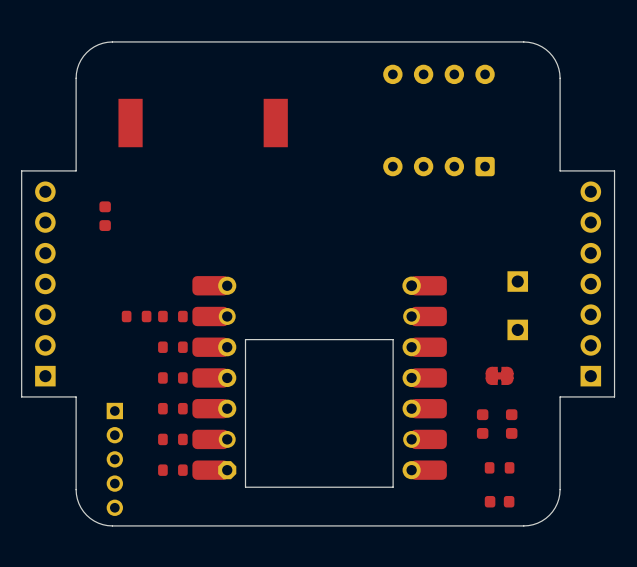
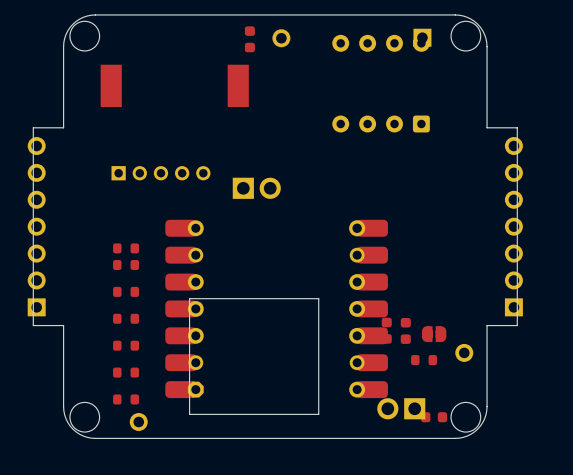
round board edge: none -> [69, 21, 100, 52]
round board edge: none -> [450, 21, 481, 52]
part: none -> (422, 37)
part: none -> (281, 38)
part: none -> (249, 39)
board edge: (41, 170) (21, 170) (21, 396) (41, 396) -> (33, 127) (33, 325)
board edge: (594, 170) (614, 170) (614, 396) (594, 396) -> (517, 127) (517, 325)
part: (105, 216) -> none
part: none -> (256, 188)
part: (517, 281) -> none
part: none -> (126, 248)
part: (136, 316) -> none
part: (172, 316) -> none
part: none -> (126, 265)
part: (517, 329) -> none
board edge: (393, 339) (245, 339) (245, 487) (393, 487) (393, 339) -> (318, 298) (318, 414) (189, 414) (189, 298) (318, 298)
part: (172, 347) -> none
part: none -> (126, 291)
part: (499, 375) -> none
part: (172, 377) -> none
part: none -> (126, 318)
part: none -> (386, 330)
part: none -> (405, 330)
part: none -> (434, 334)
part: (172, 408) -> none
part: none -> (126, 345)
part: (482, 424) -> none
part: (511, 424) -> none
part: none -> (464, 352)
part: (172, 439) -> none
part: none -> (126, 372)
part rotation: 0° (114, 459) -> 90° counterclockwise (160, 173)
part position: (114, 459) -> (160, 173)
part position: (499, 467) -> (424, 360)
part: (172, 470) -> none
part: none -> (126, 399)
round board edge: none -> [69, 402, 100, 433]
round board edge: none -> [450, 402, 481, 433]
part: none -> (401, 408)
part: none -> (138, 421)

